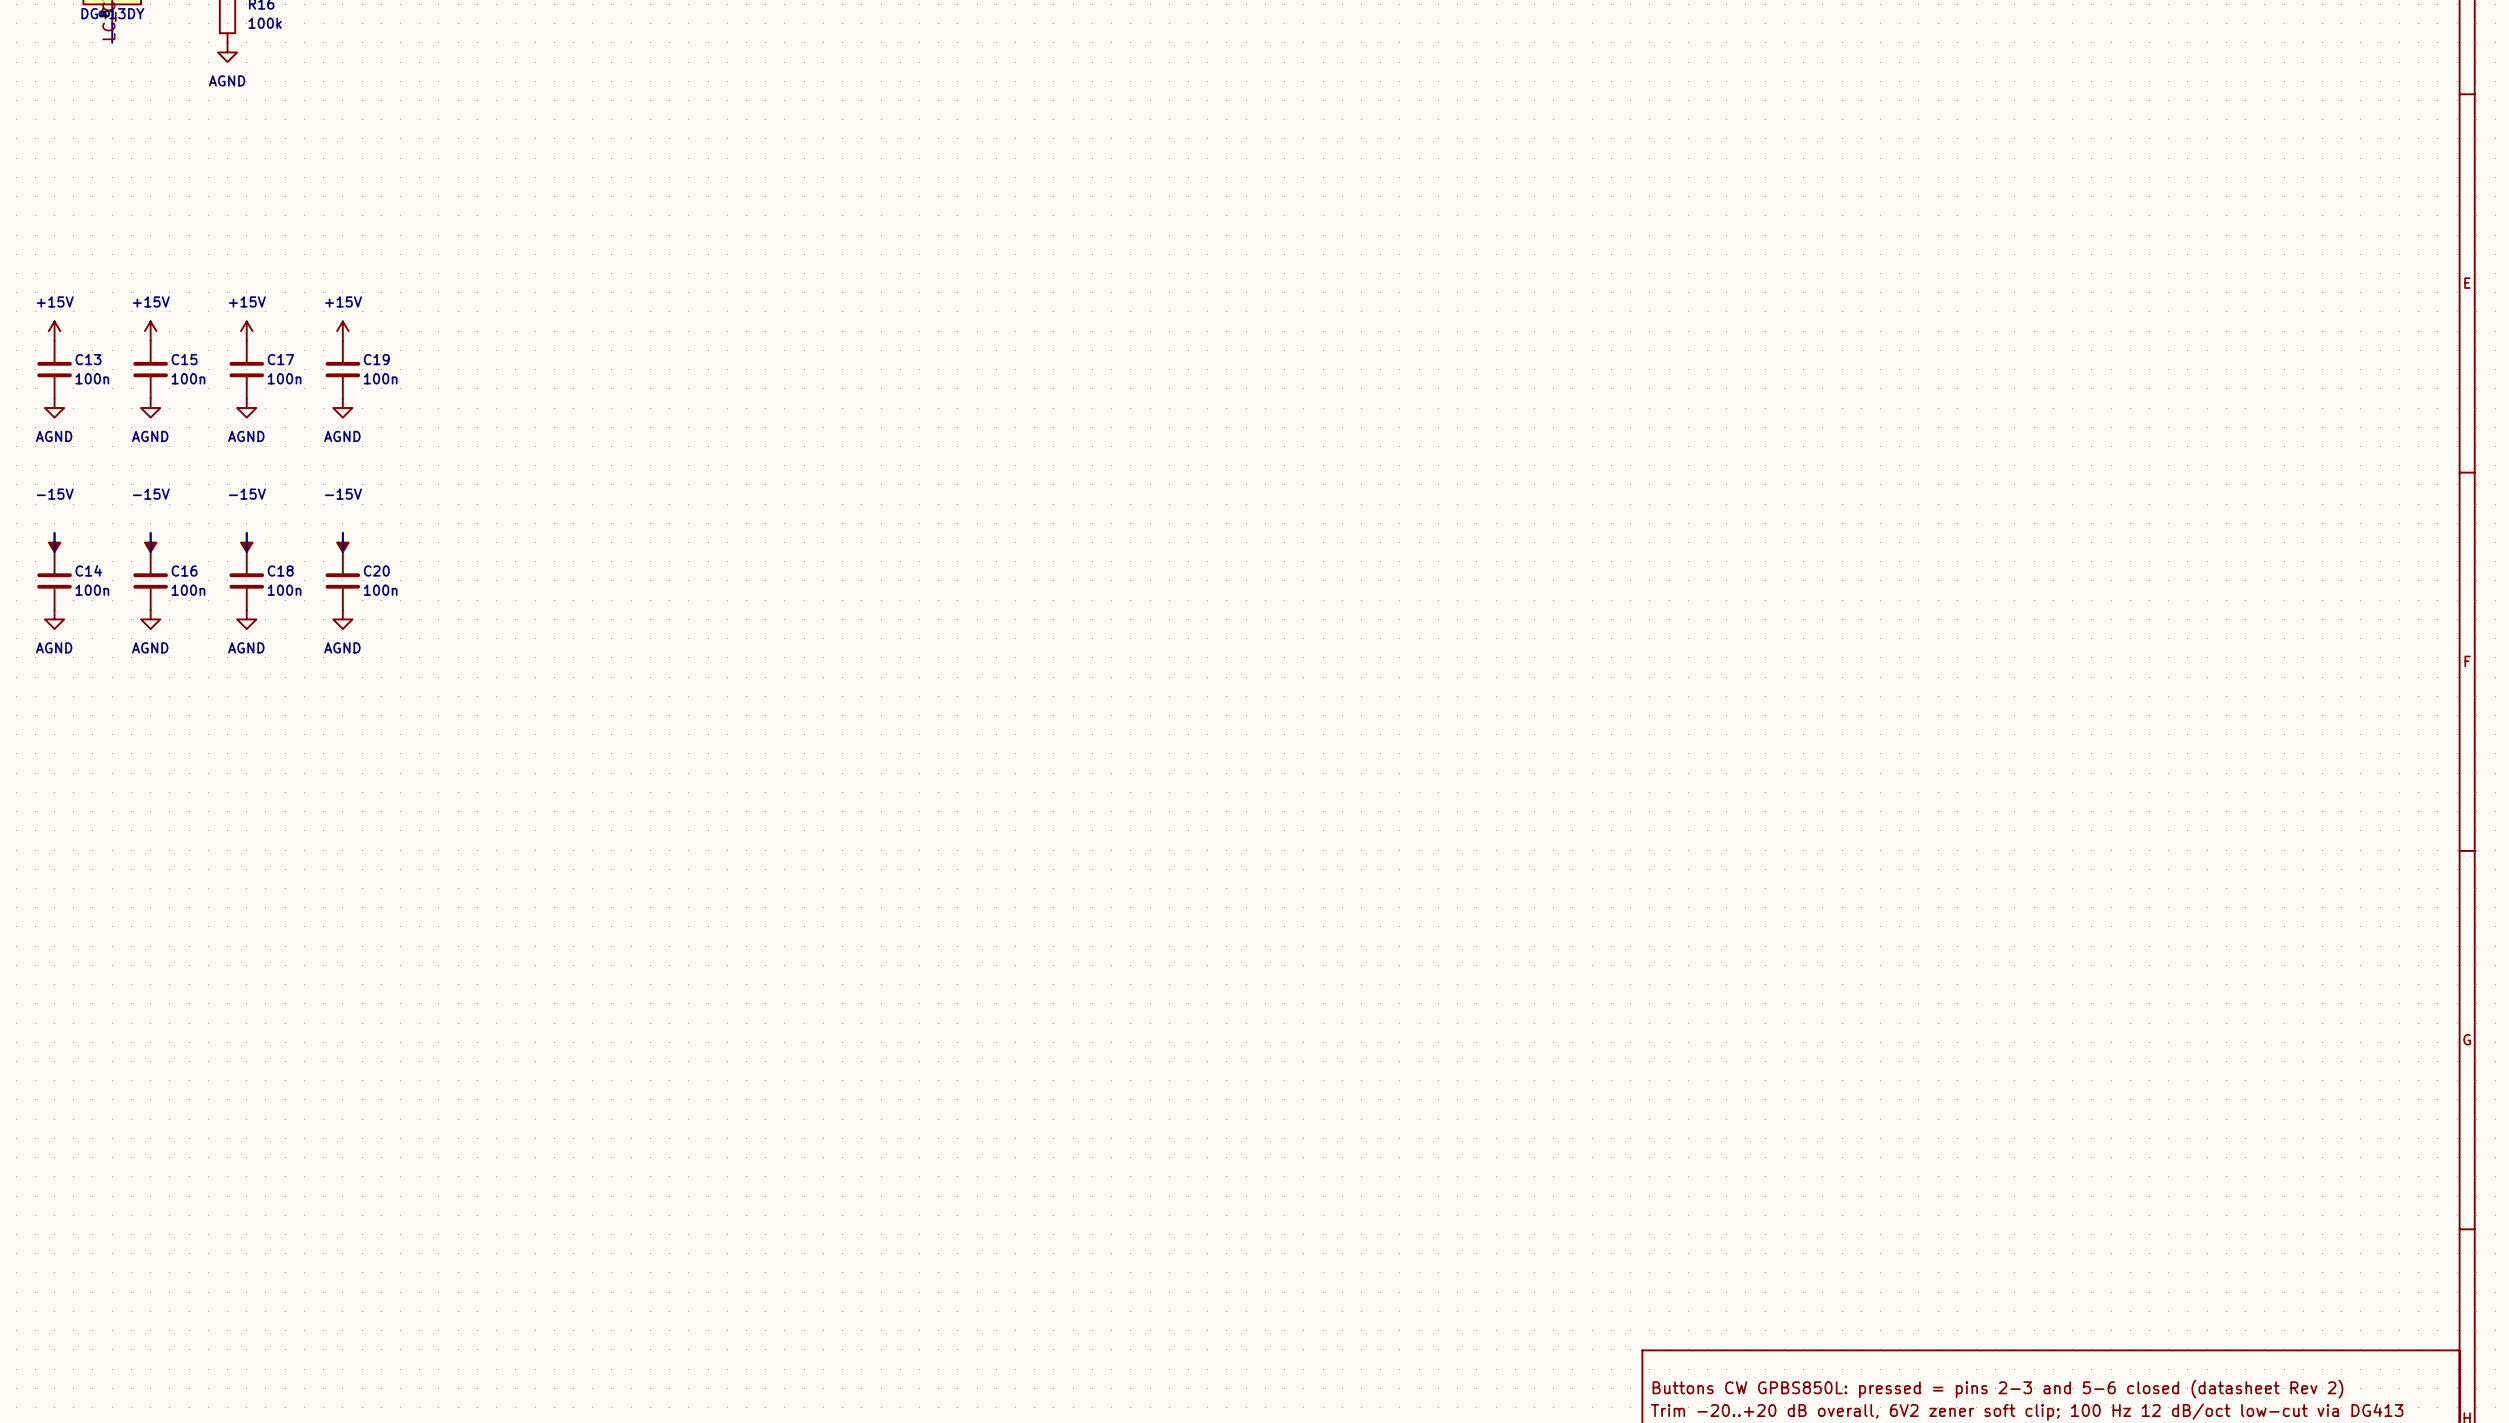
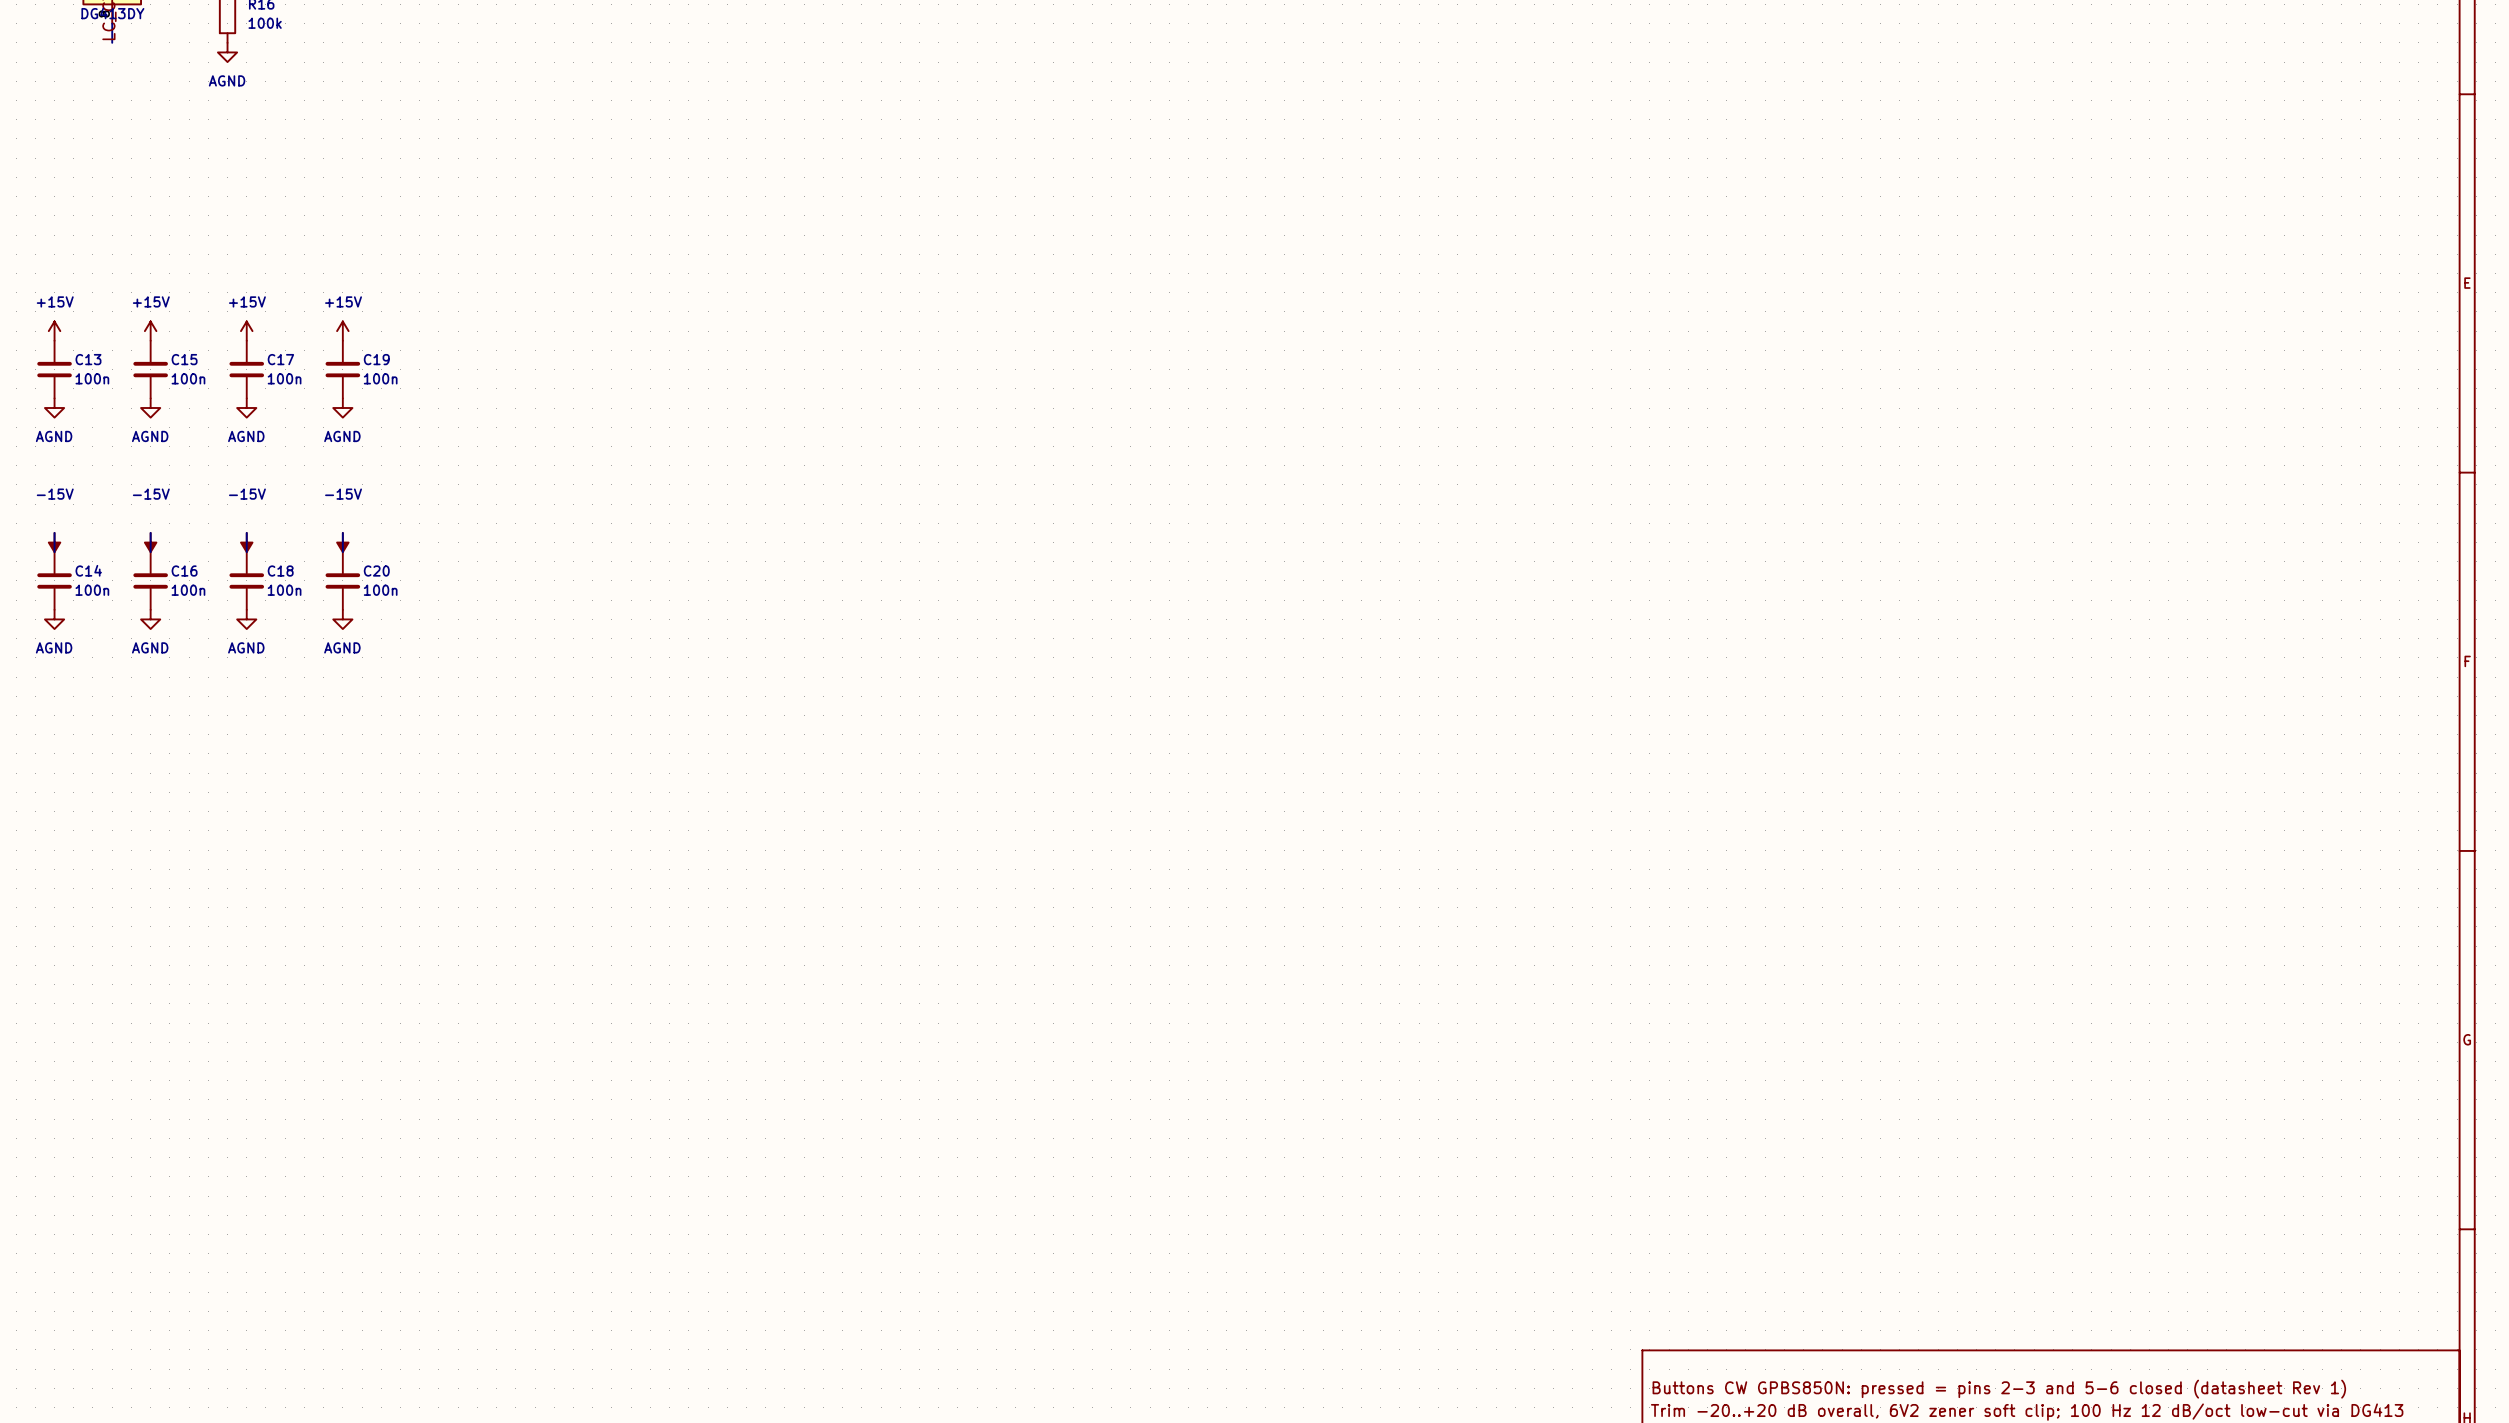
title block: Buttons CW GPBS850L: pressed = pins 2-3 and 5-6 closed (datasheet Rev 2) (1997, 1389) -> Buttons CW GPBS850N: pressed = pins 2-3 and 5-6 closed (datasheet Rev 1) (1999, 1389)

